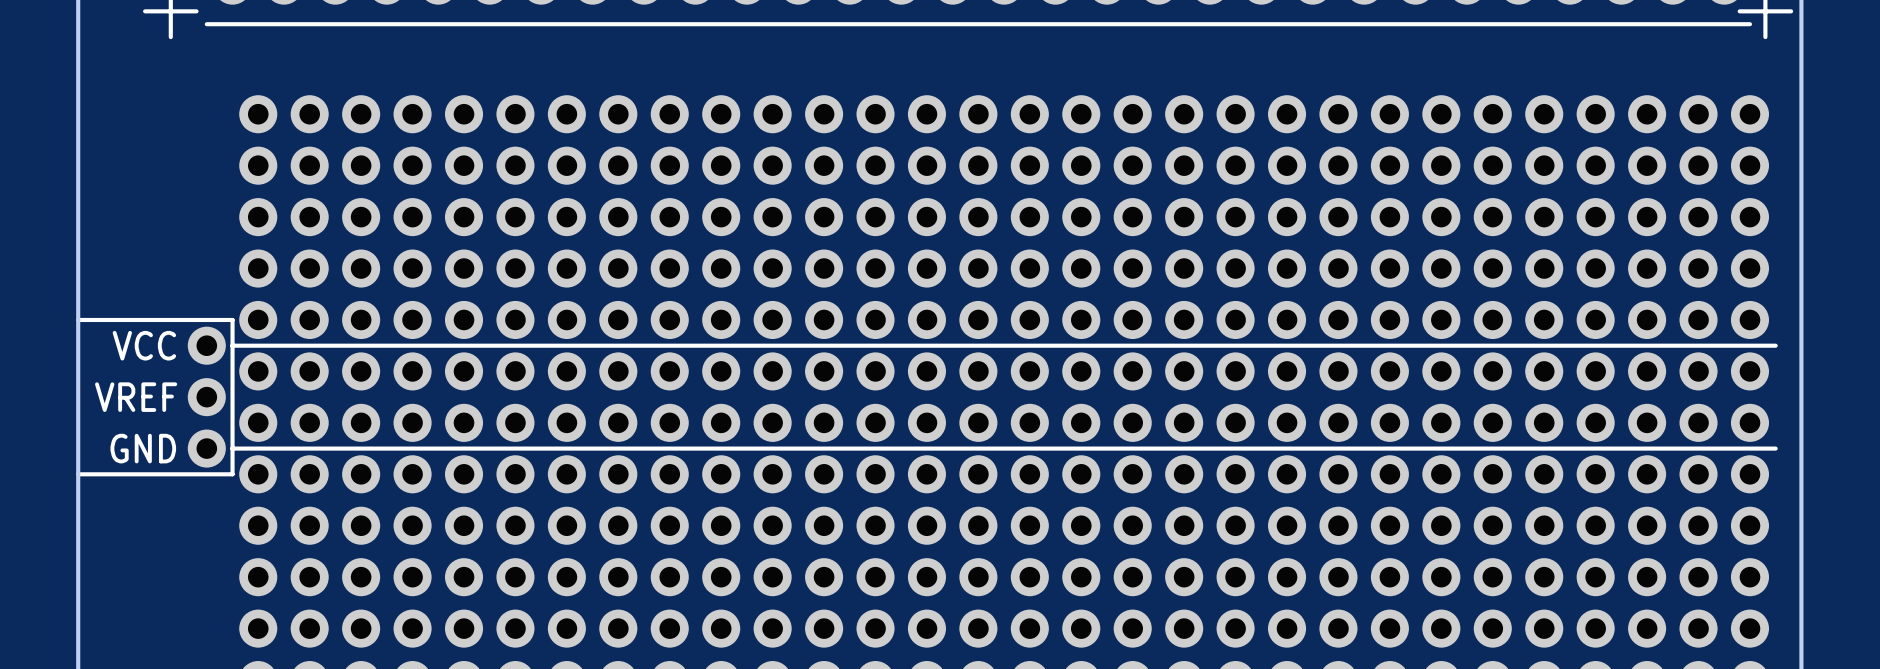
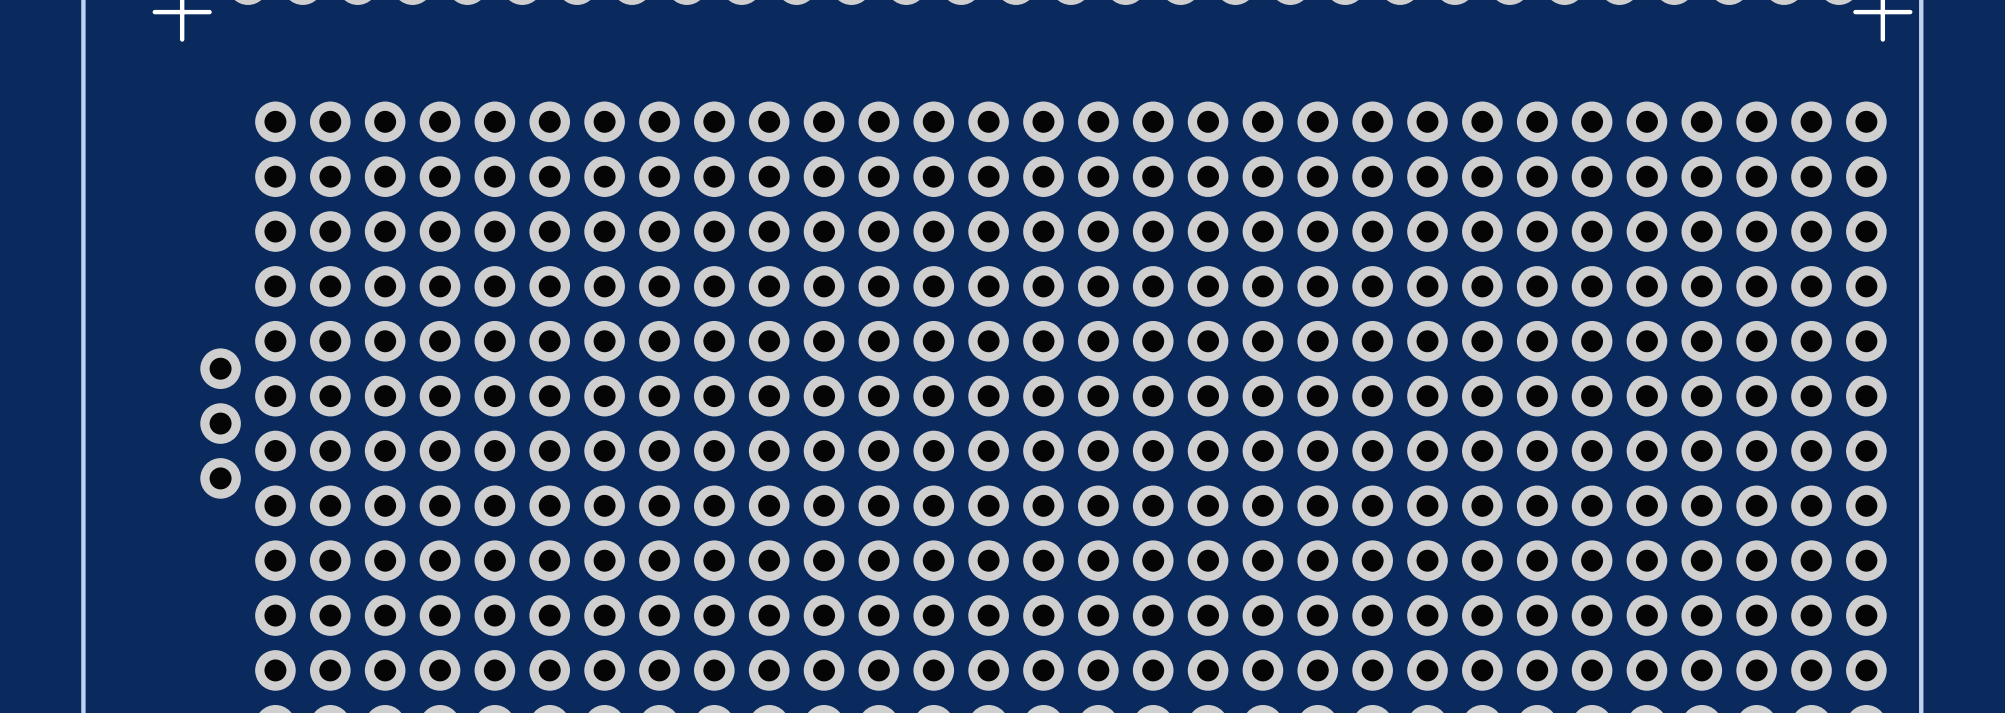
line: (1749, 24) (206, 24) -> none
line: (78, 319) (232, 319) (232, 474) (78, 474) -> none
text: VCC (144, 345) -> none
line: (1775, 345) (232, 345) -> none
text: VREF (136, 397) -> none
text: GND (143, 448) -> none
line: (1775, 448) (232, 448) -> none

